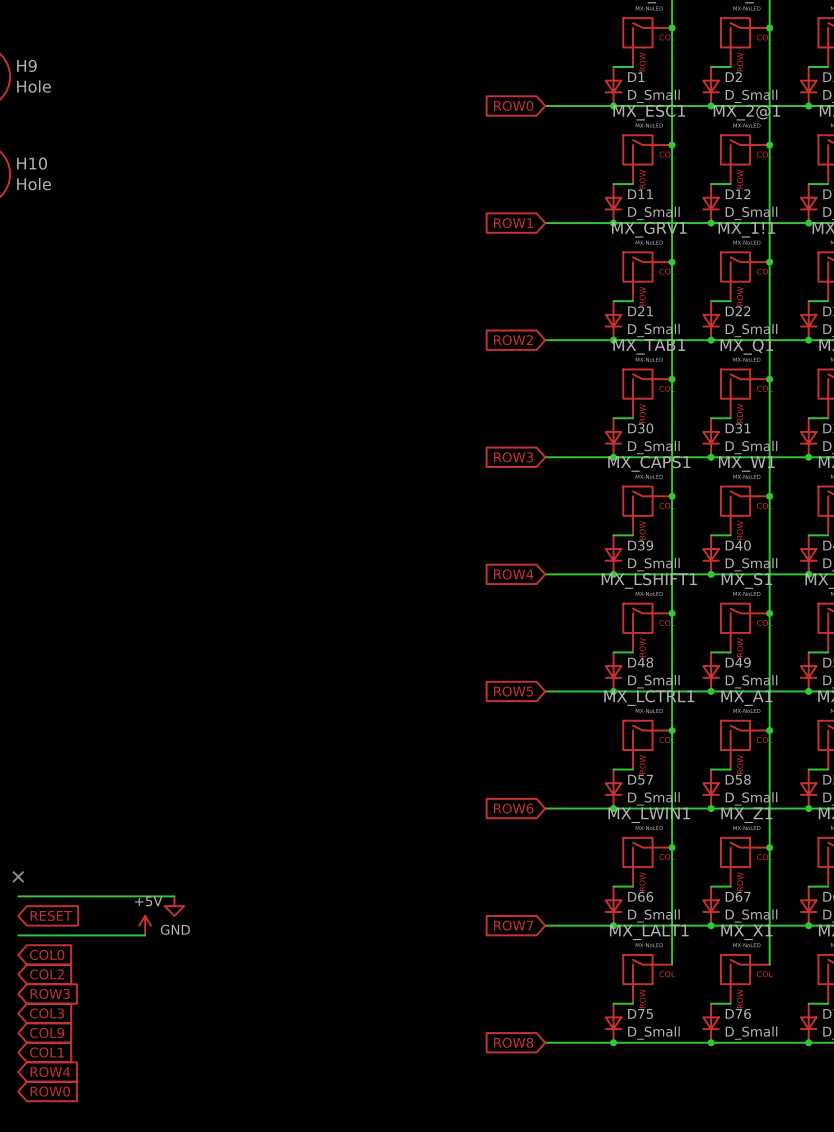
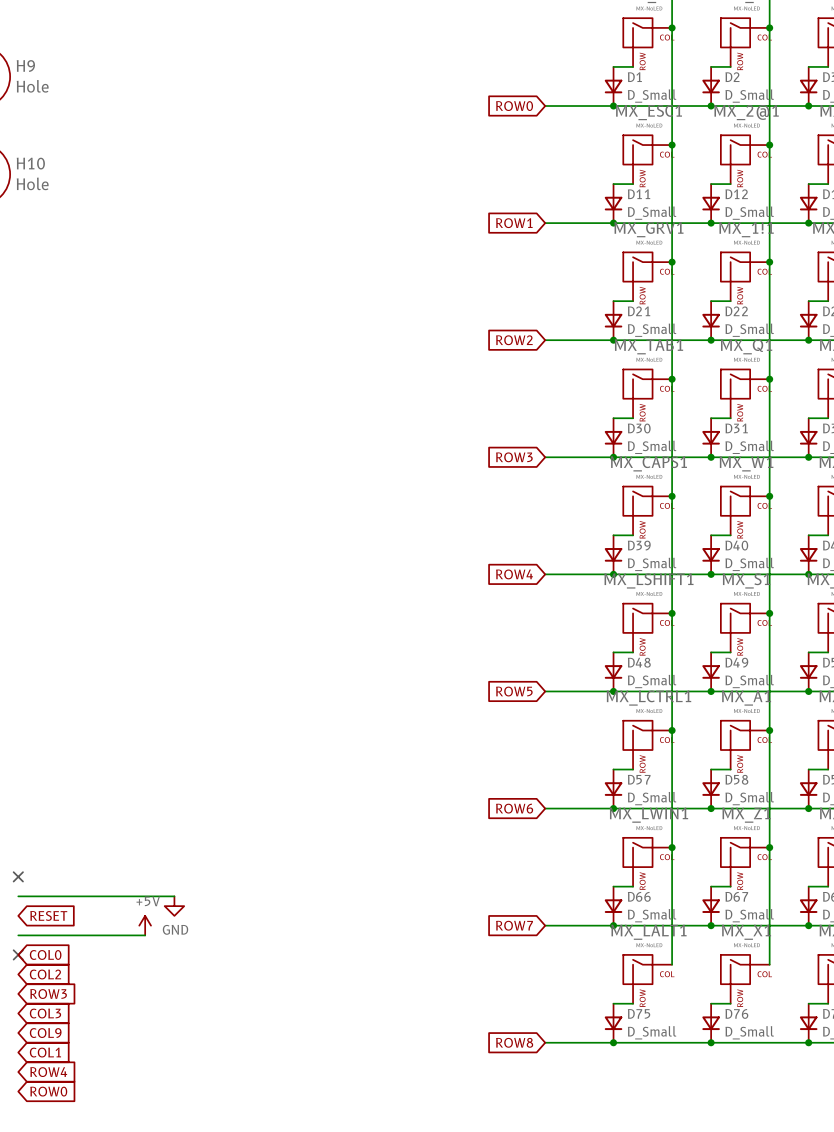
no-connect mark: none -> (18, 954)

